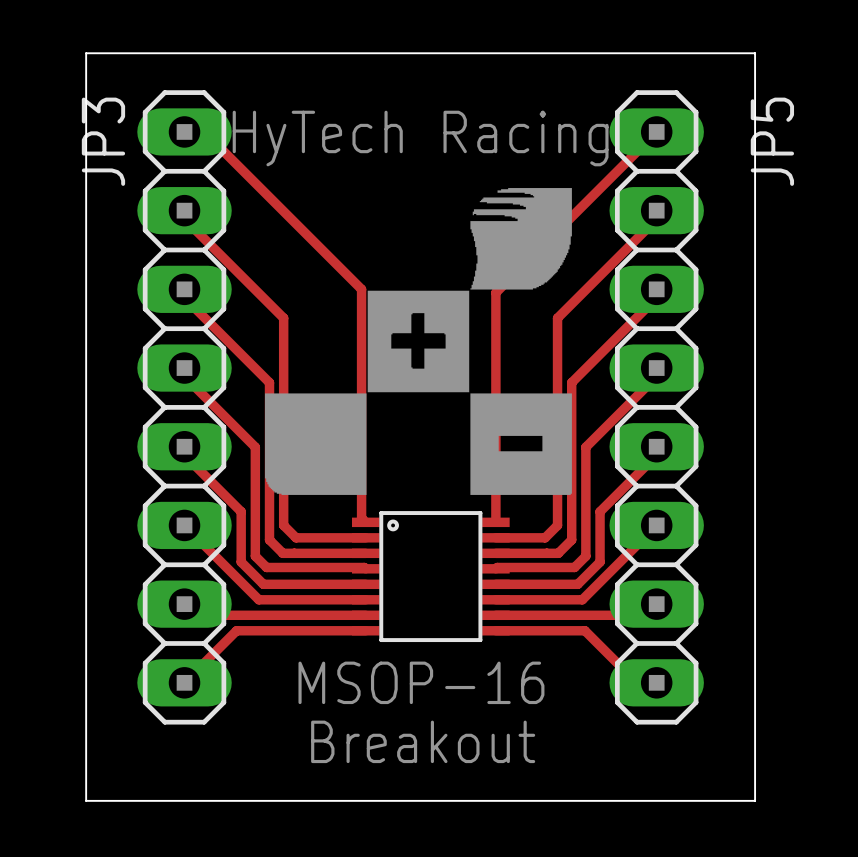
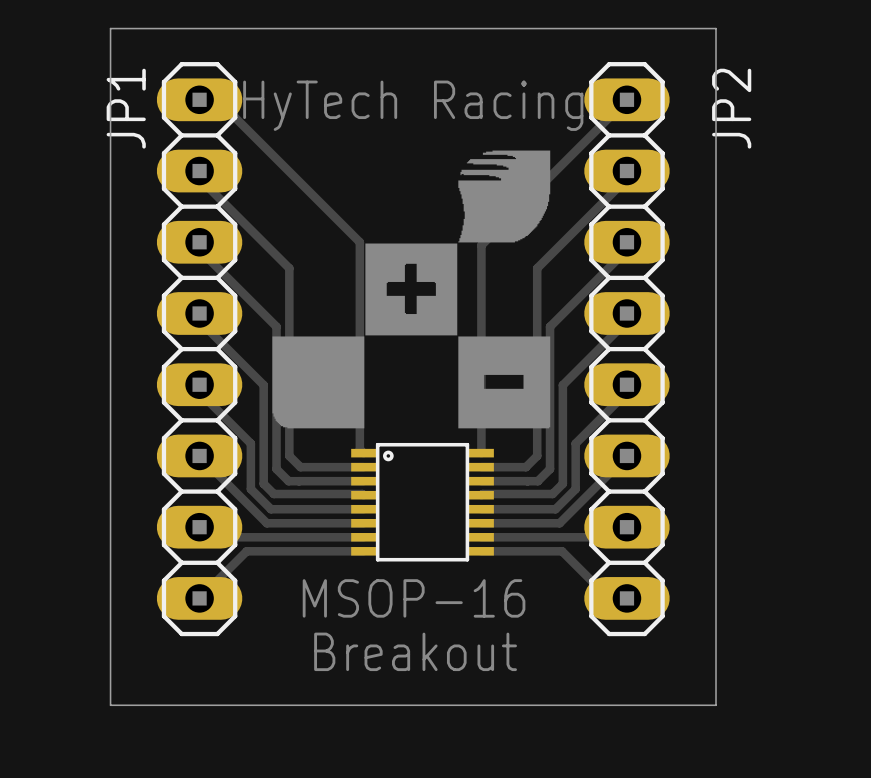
JP3 name: JP3 (103, 141) -> JP1 (126, 108)
JP5 name: JP5 (772, 141) -> JP2 (731, 108)

